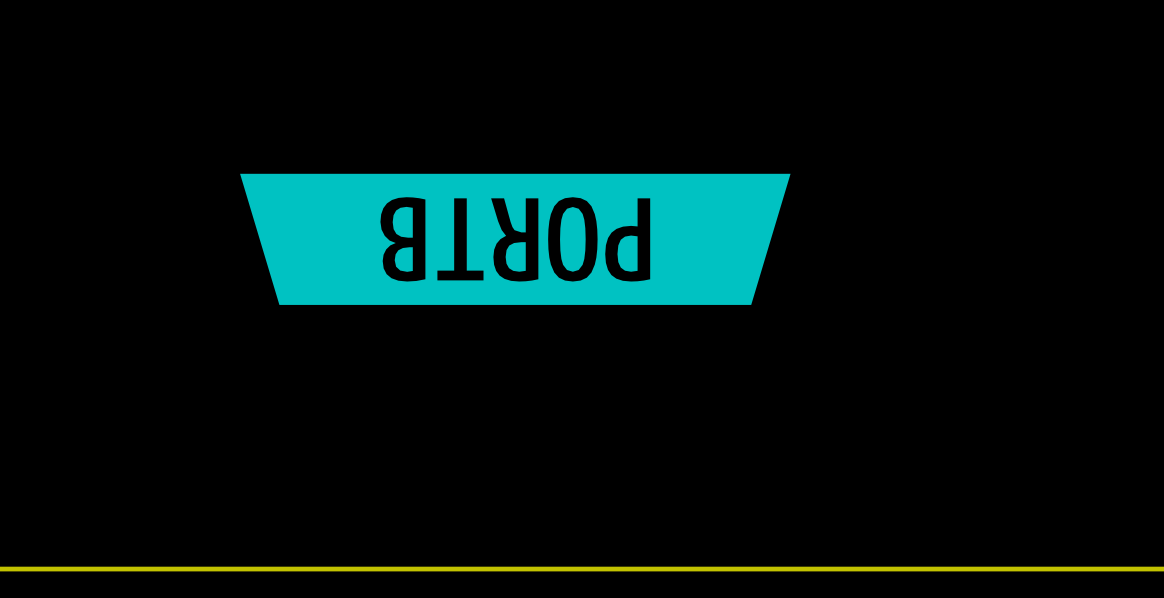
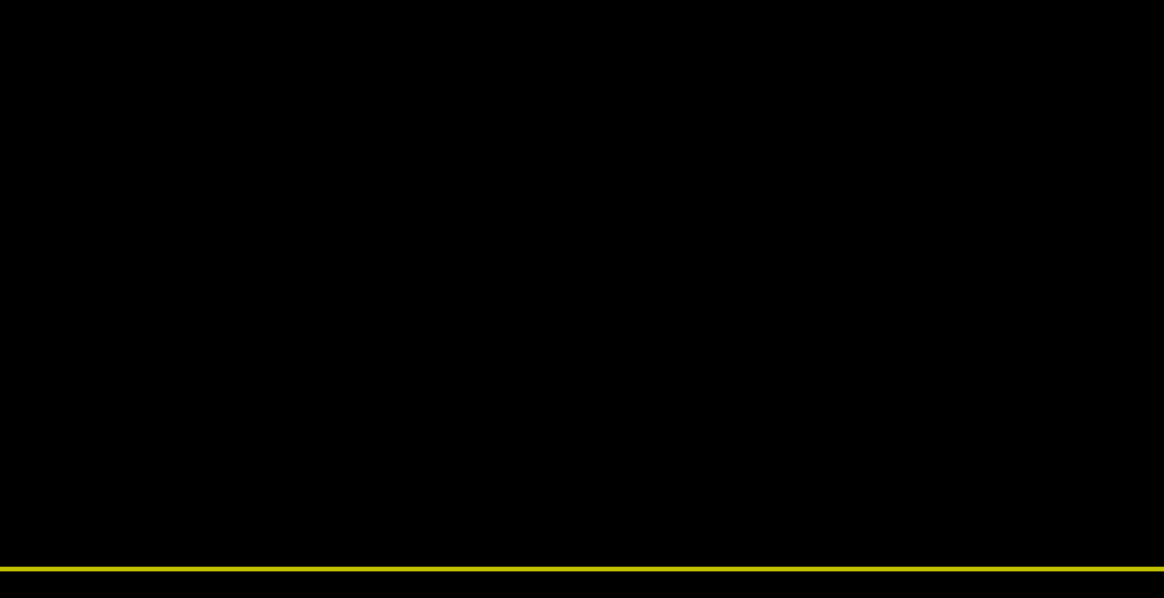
drawing: [240, 173, 791, 305] -> none

